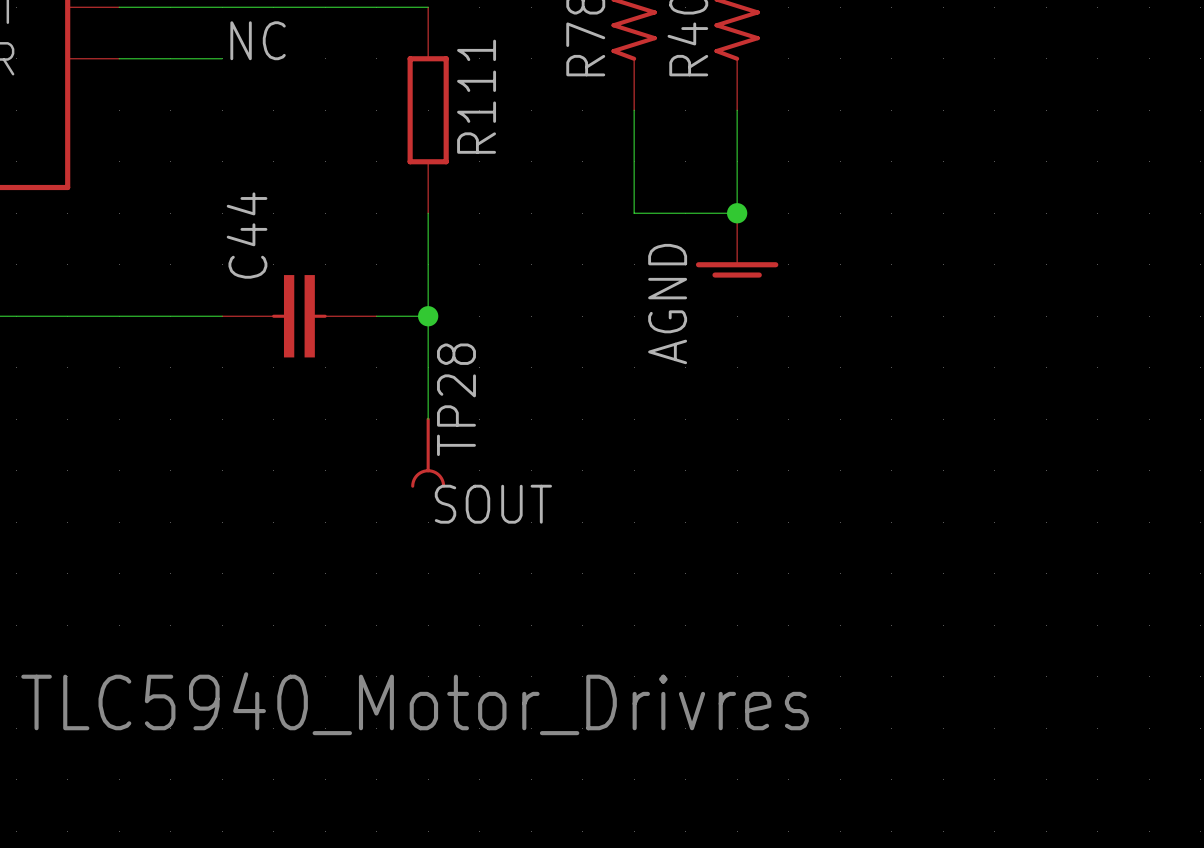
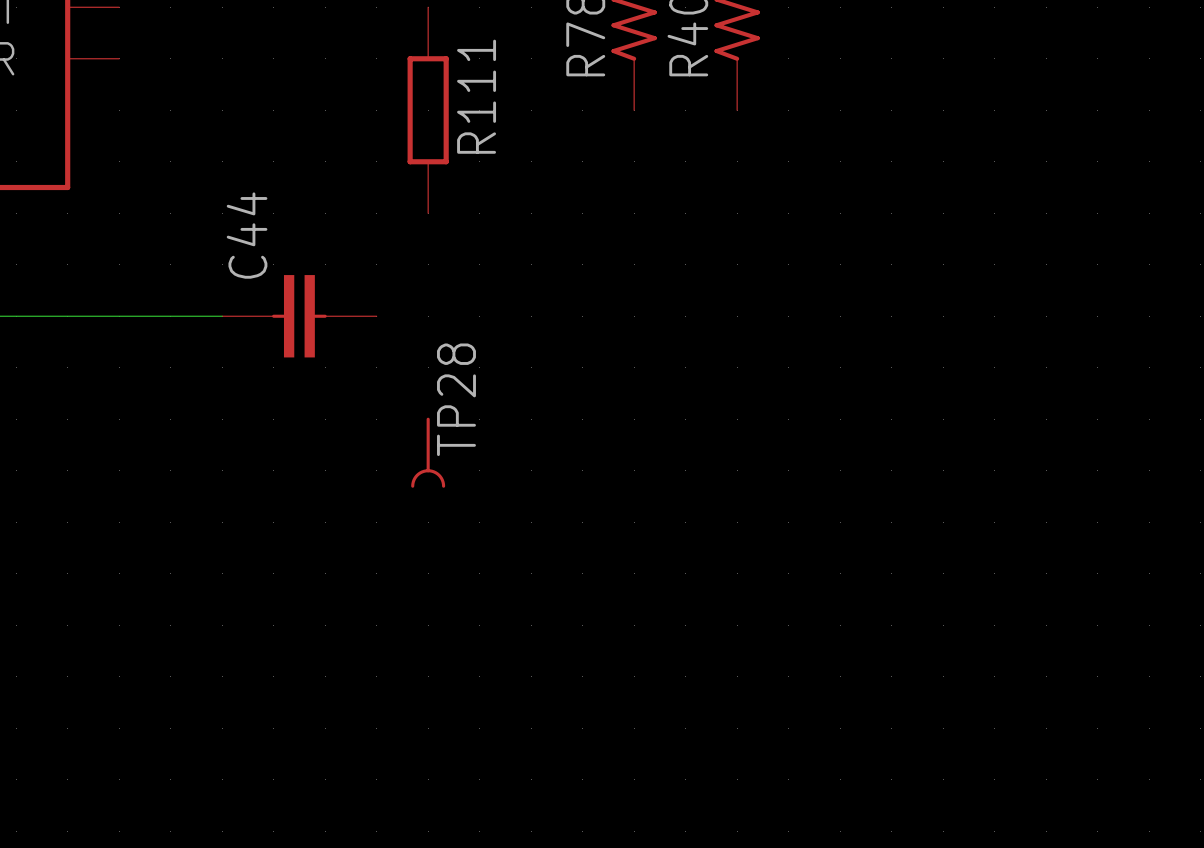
wire: (119, 7) (428, 7) -> none
label: NC (258, 40) -> none
wire: (119, 58) (222, 58) -> none
wire: (634, 110) (634, 213) (737, 213) (737, 110) -> none
wire: (428, 213) (428, 419) -> none
junction: (737, 213) -> none
power symbol: AGND (737, 245) -> none
wire: (376, 316) (428, 316) -> none
junction: (428, 316) -> none
label: SOUT (493, 504) -> none
text: TLC5940_Motor_Drivres (415, 703) -> none

